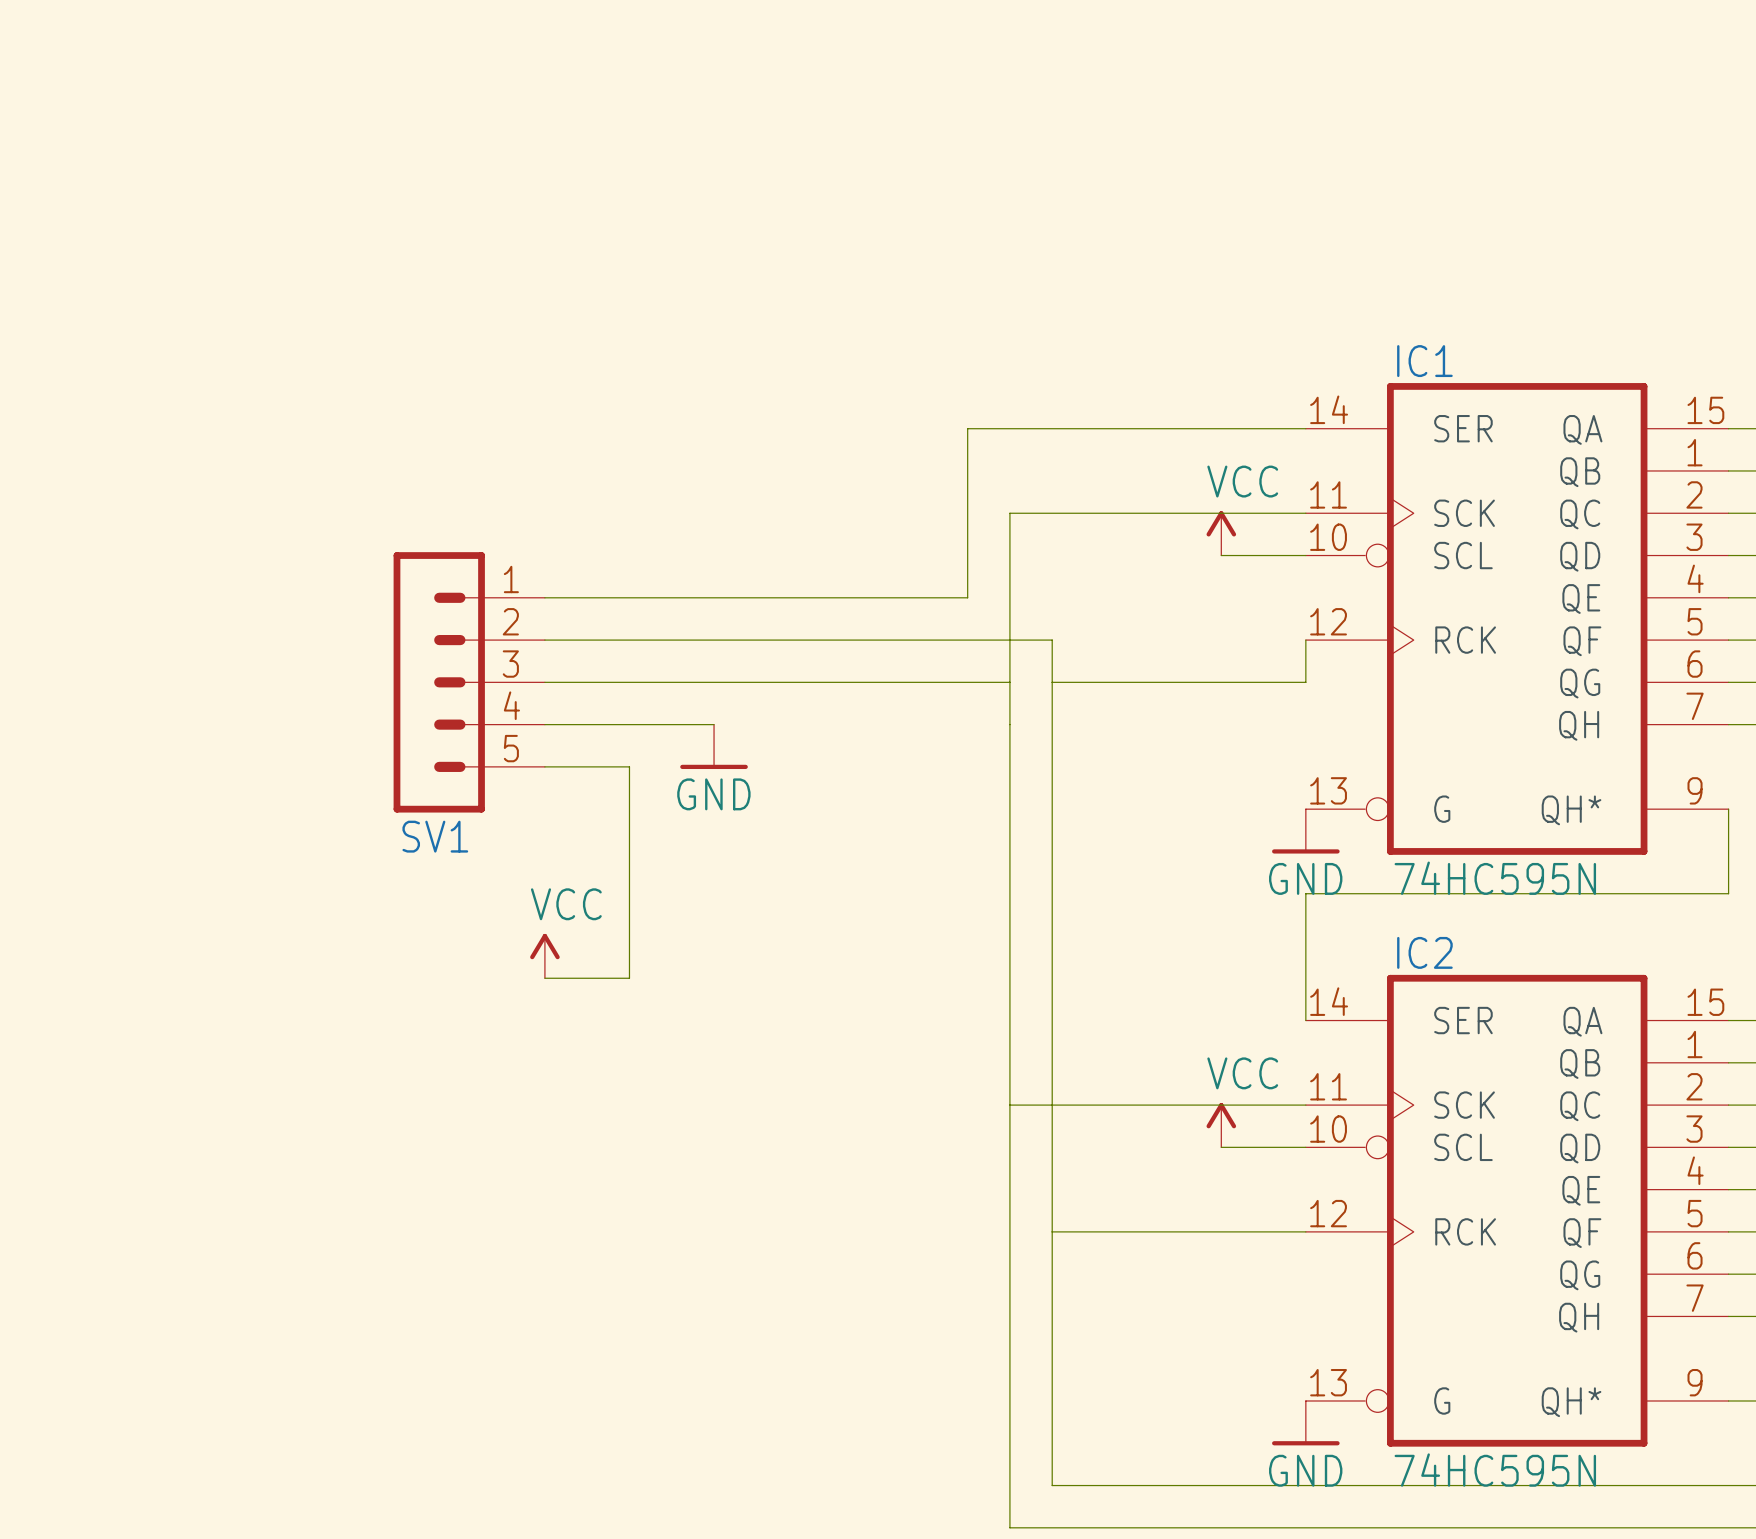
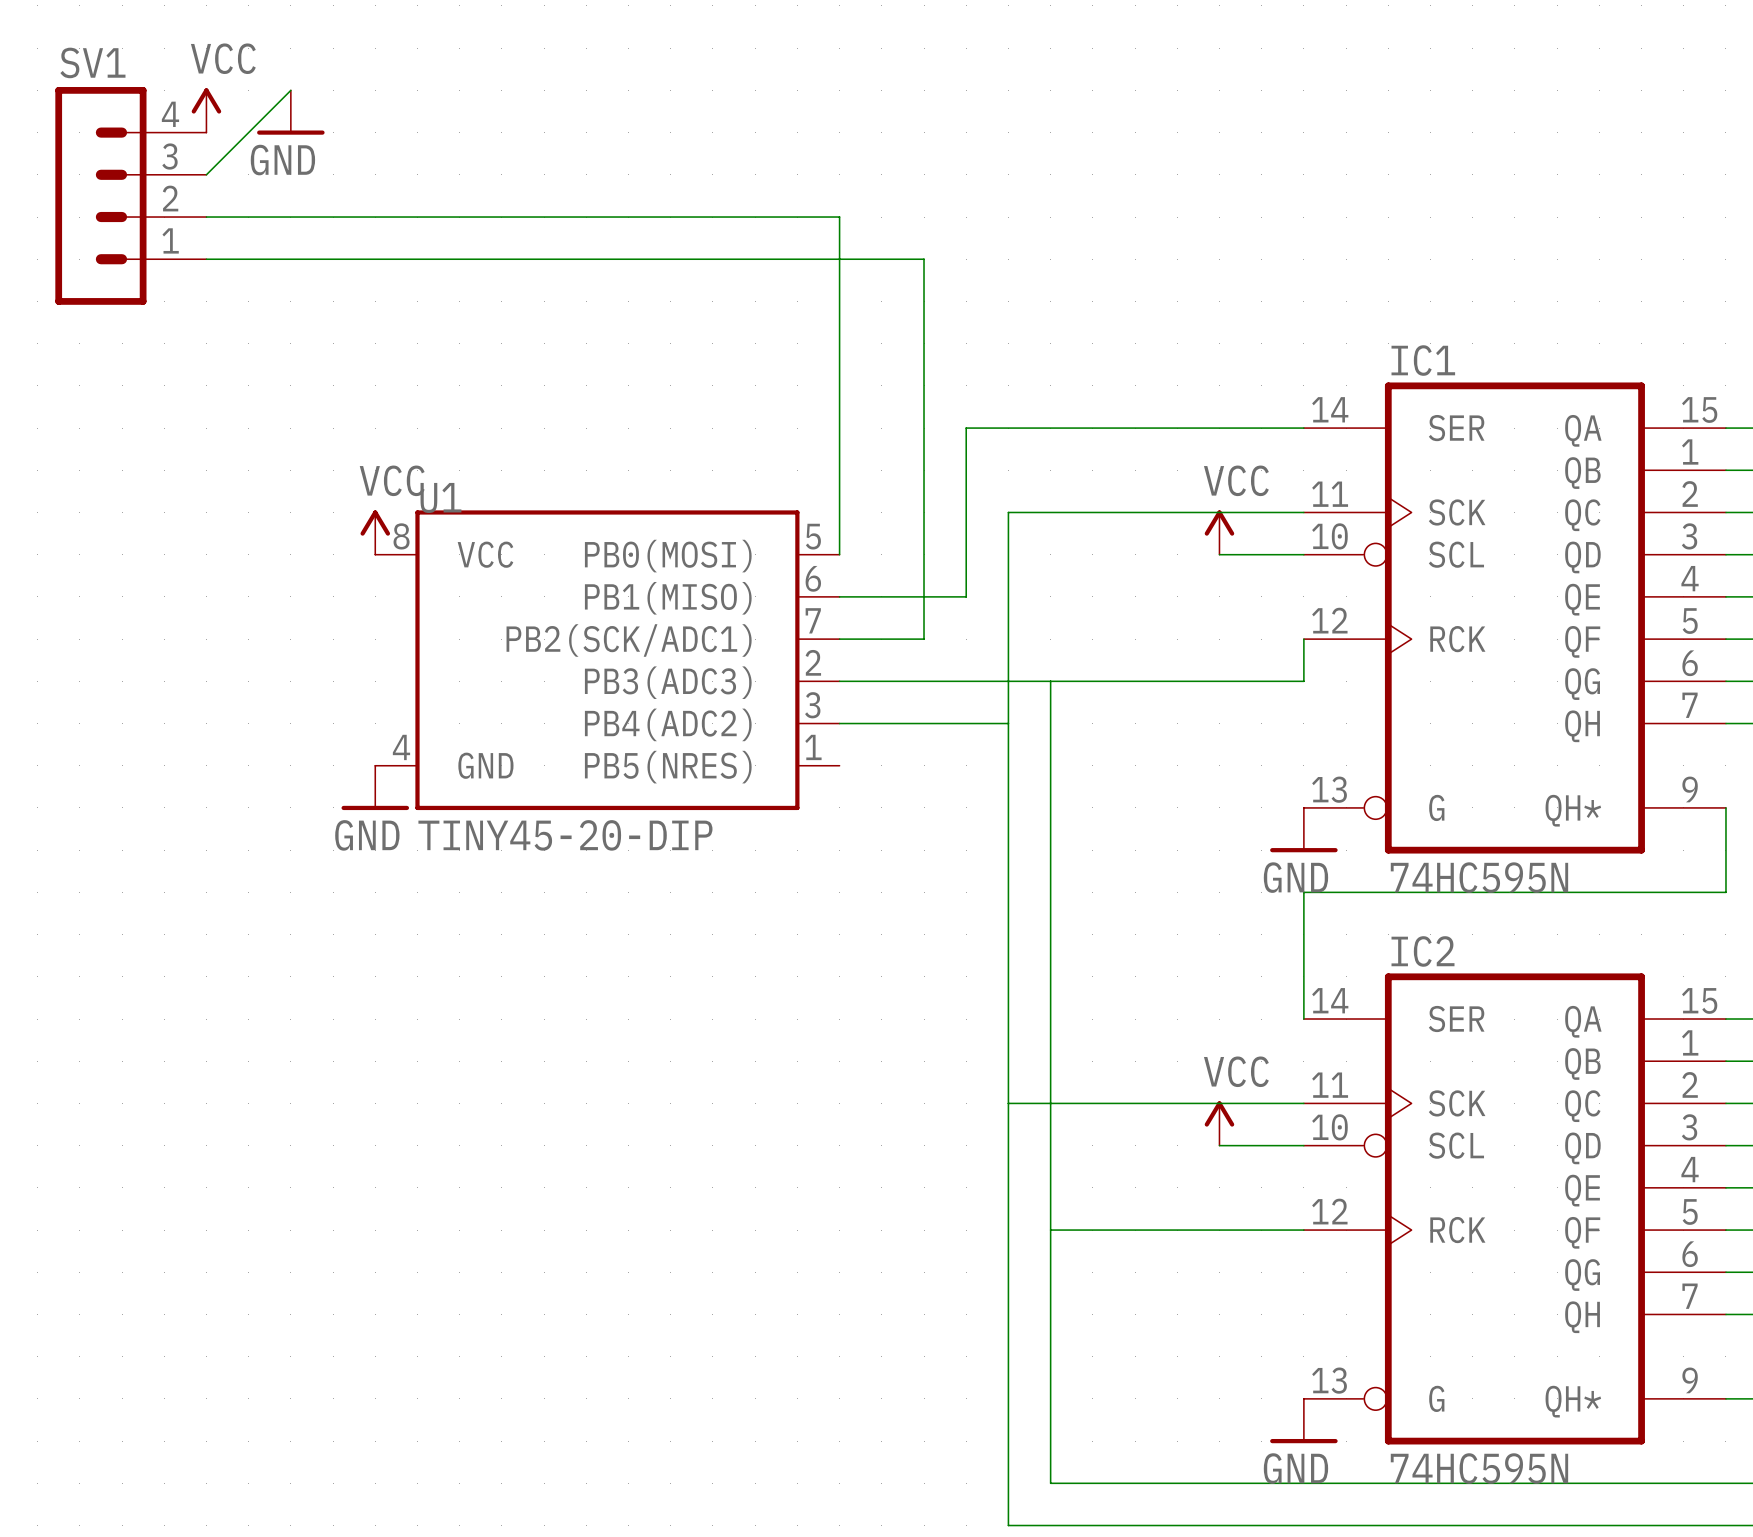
wire: none -> (290, 90) (206, 174)
power symbol: none -> VCC (206, 110)
power symbol: none -> GND (290, 112)
wire: none -> (206, 217) (839, 217) (839, 554)
wire: none -> (206, 259) (924, 259) (924, 639)
power symbol: none -> VCC (375, 532)
SV1 symbol: [393, 552, 545, 813] -> [55, 87, 207, 305]
wire: (544, 597) (840, 597) -> none
wire: (544, 640) (840, 640) -> none
wire: (925, 640) (1052, 640) (1052, 682) -> (1008, 681) (1050, 681)
U1: none -> TINY45-20-DIP (607, 660)
wire: (544, 682) (840, 682) -> none
wire: (544, 724) (714, 724) -> (839, 723) (1008, 723)
power symbol position: GND (714, 746) -> GND (375, 787)
wire: (544, 766) (629, 766) (629, 978) (544, 978) -> none
SV1 name position: SV1 (435, 836) -> SV1 (92, 62)
power symbol: VCC (544, 956) -> none

